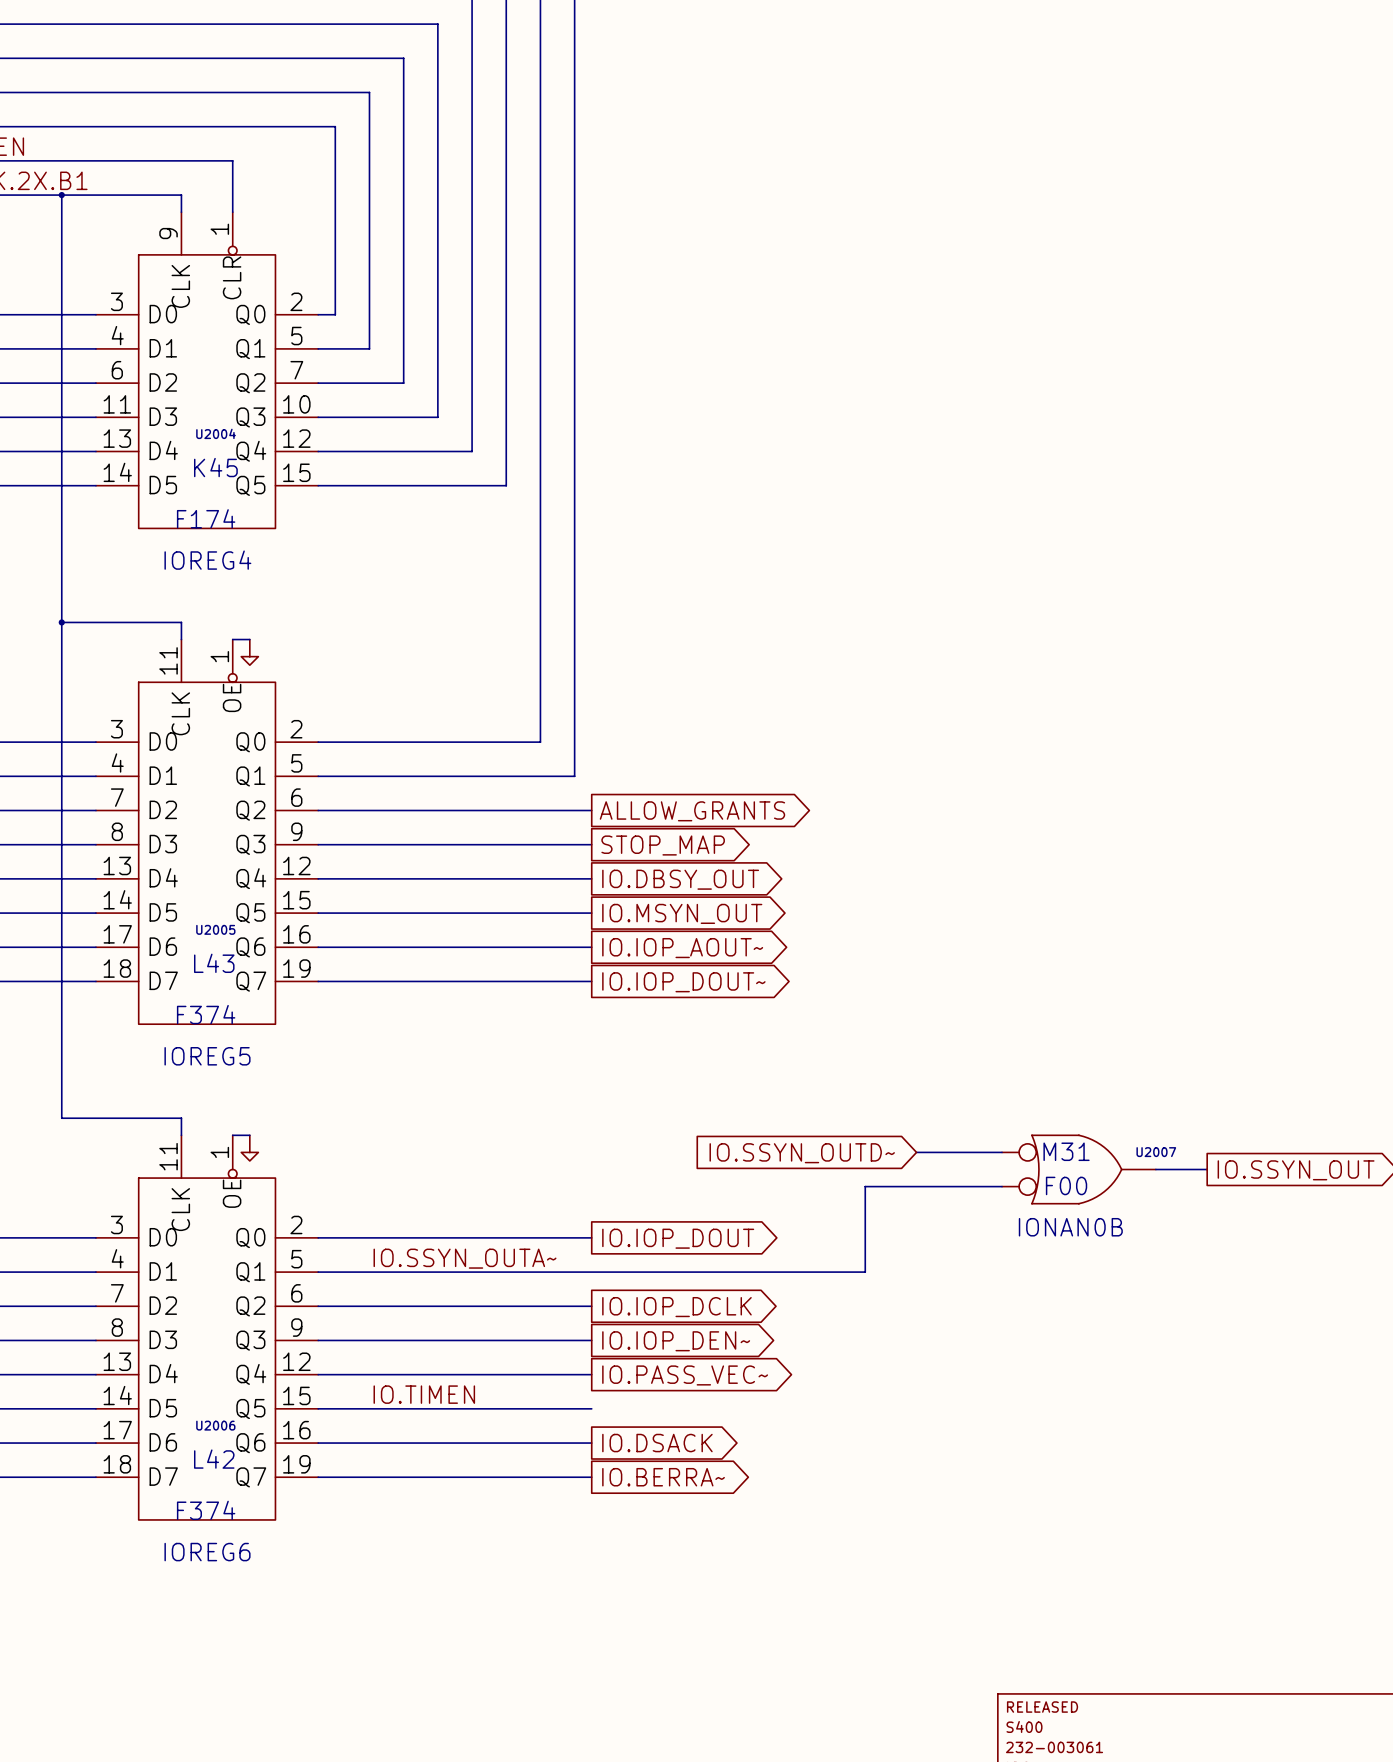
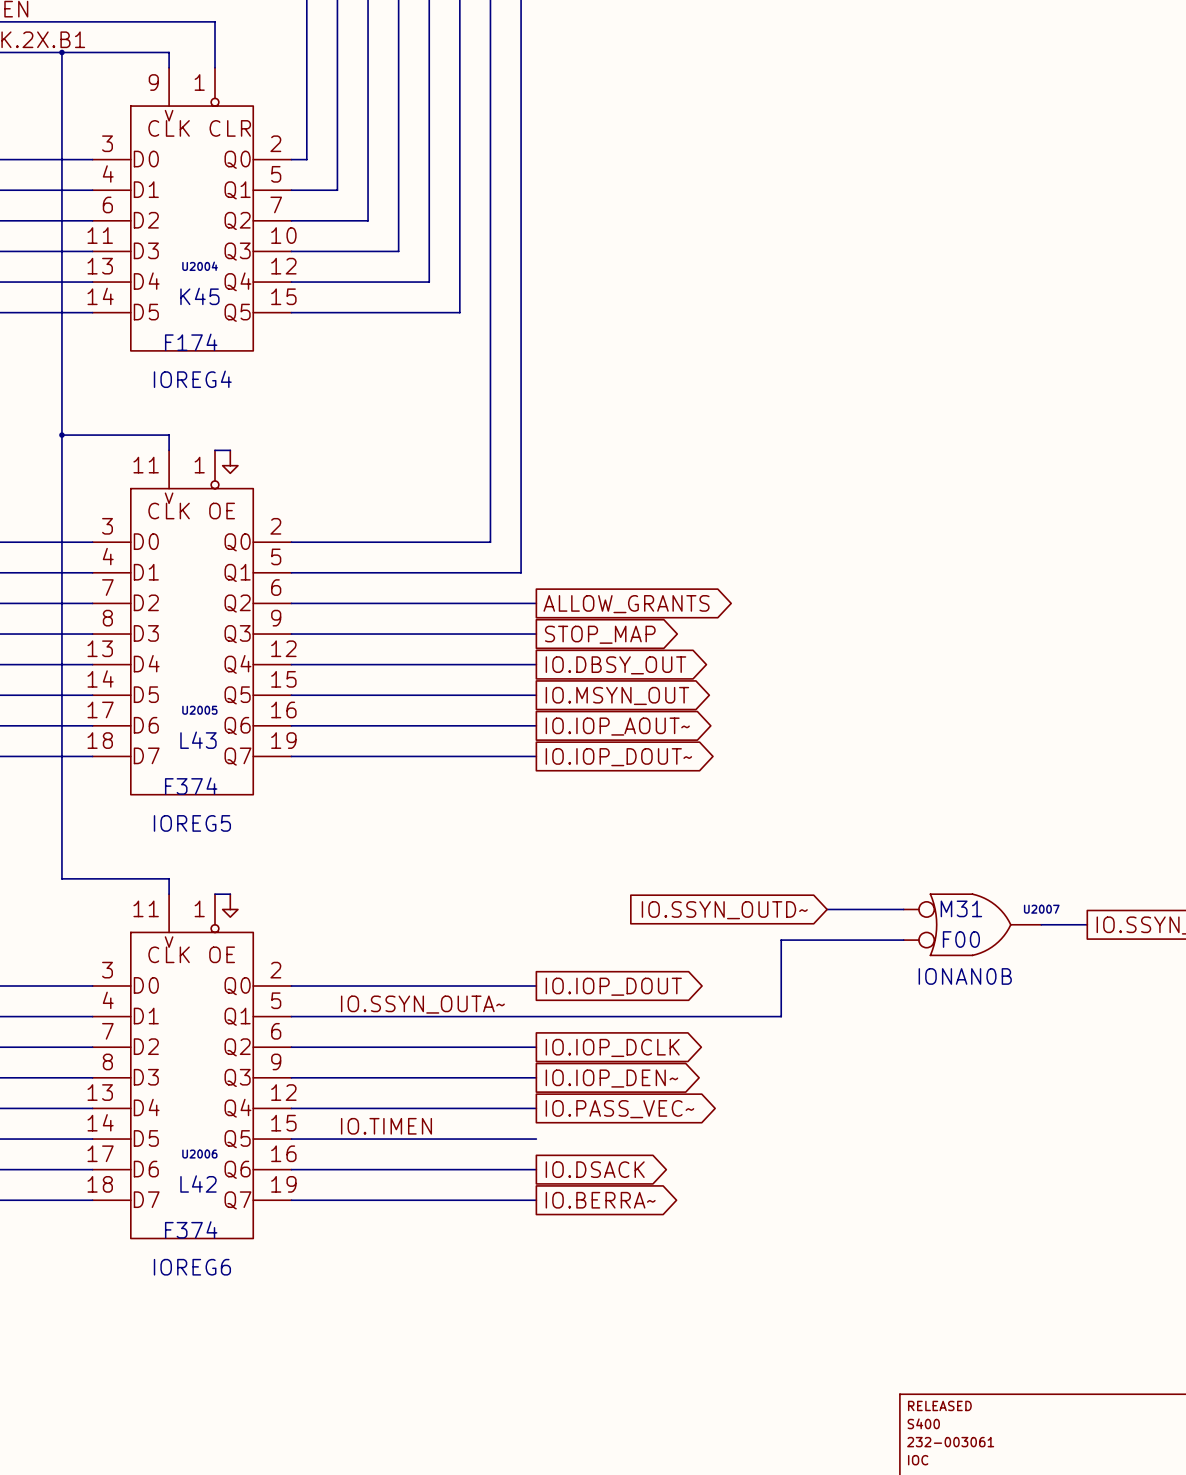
U2004 symbol: [95, 212, 319, 529] -> [92, 67, 292, 351]
U2005 symbol: [95, 639, 319, 1025] -> [92, 450, 292, 795]
U2006 symbol: [95, 1135, 319, 1520] -> [92, 894, 292, 1239]

